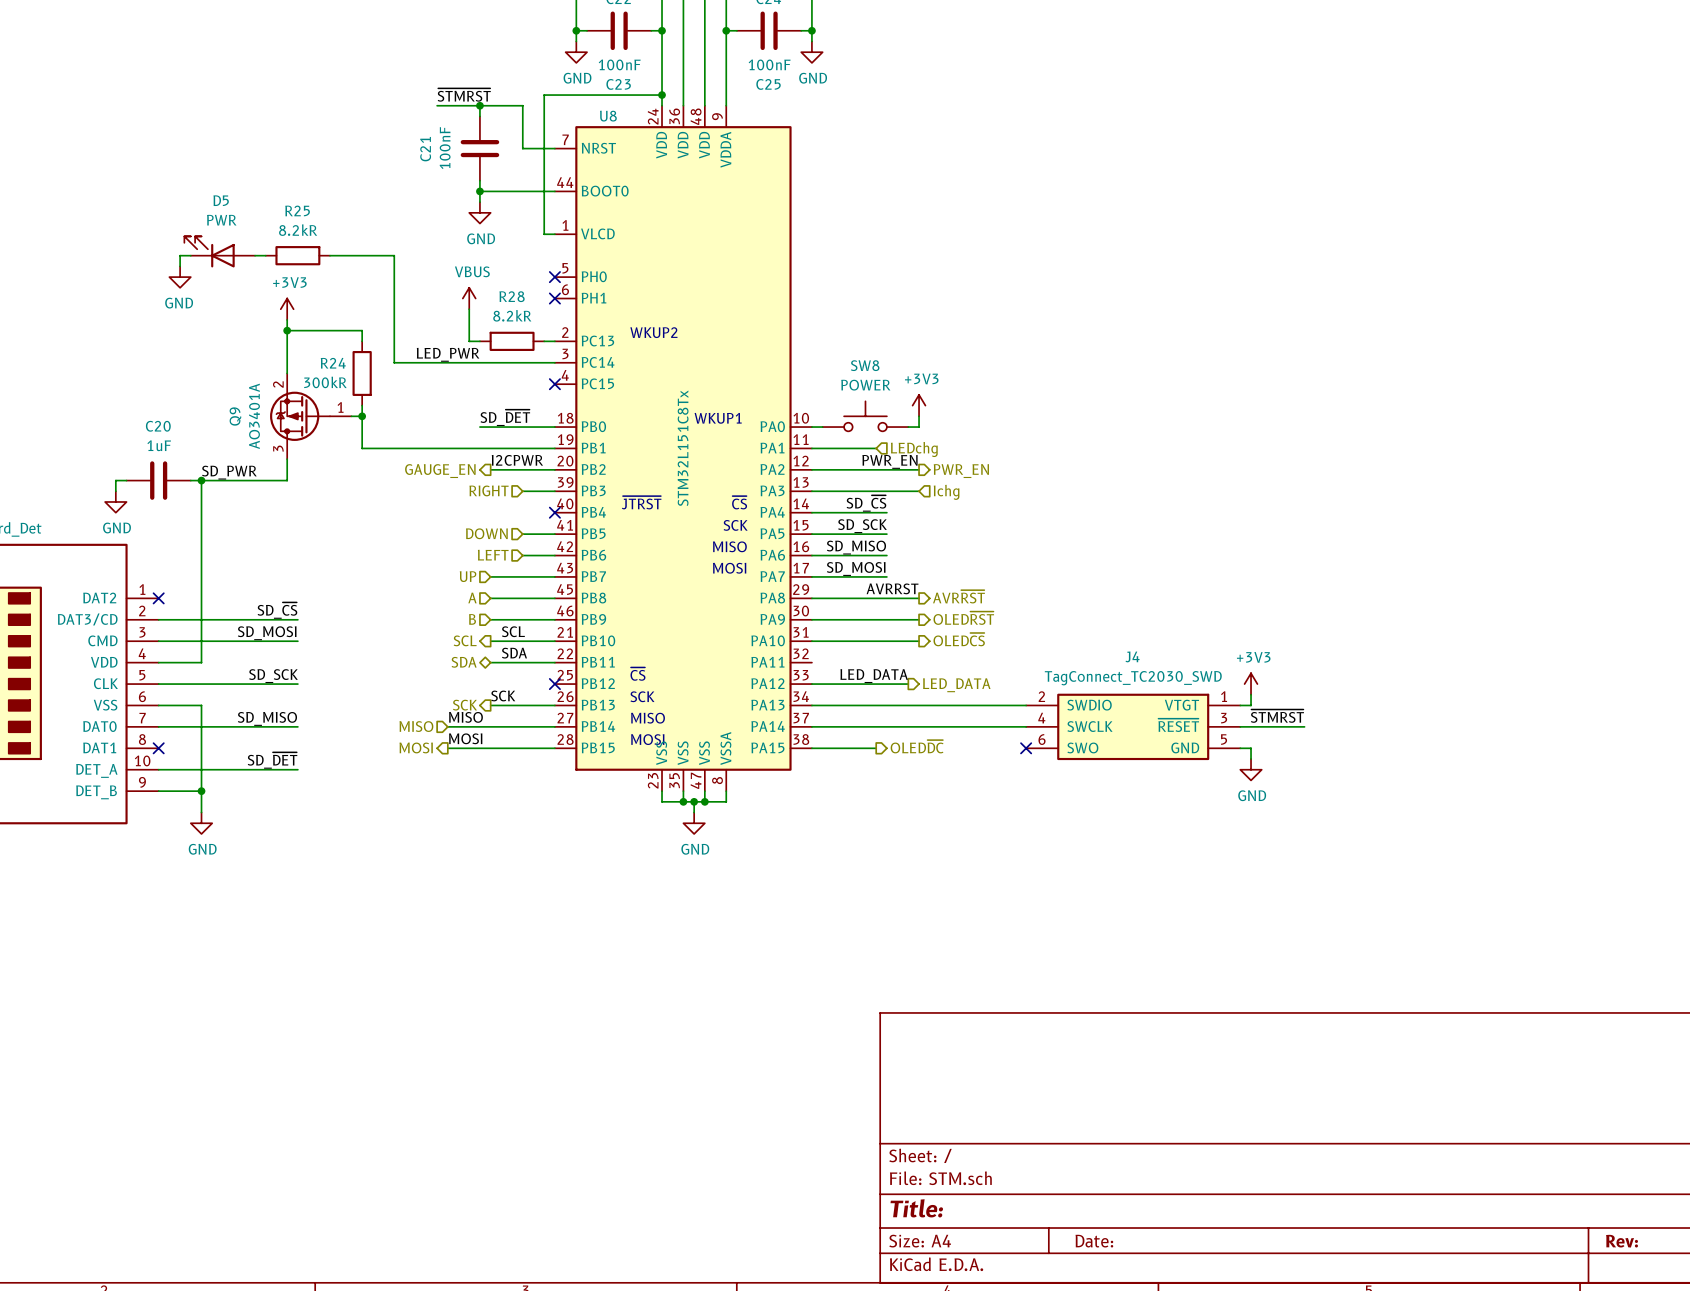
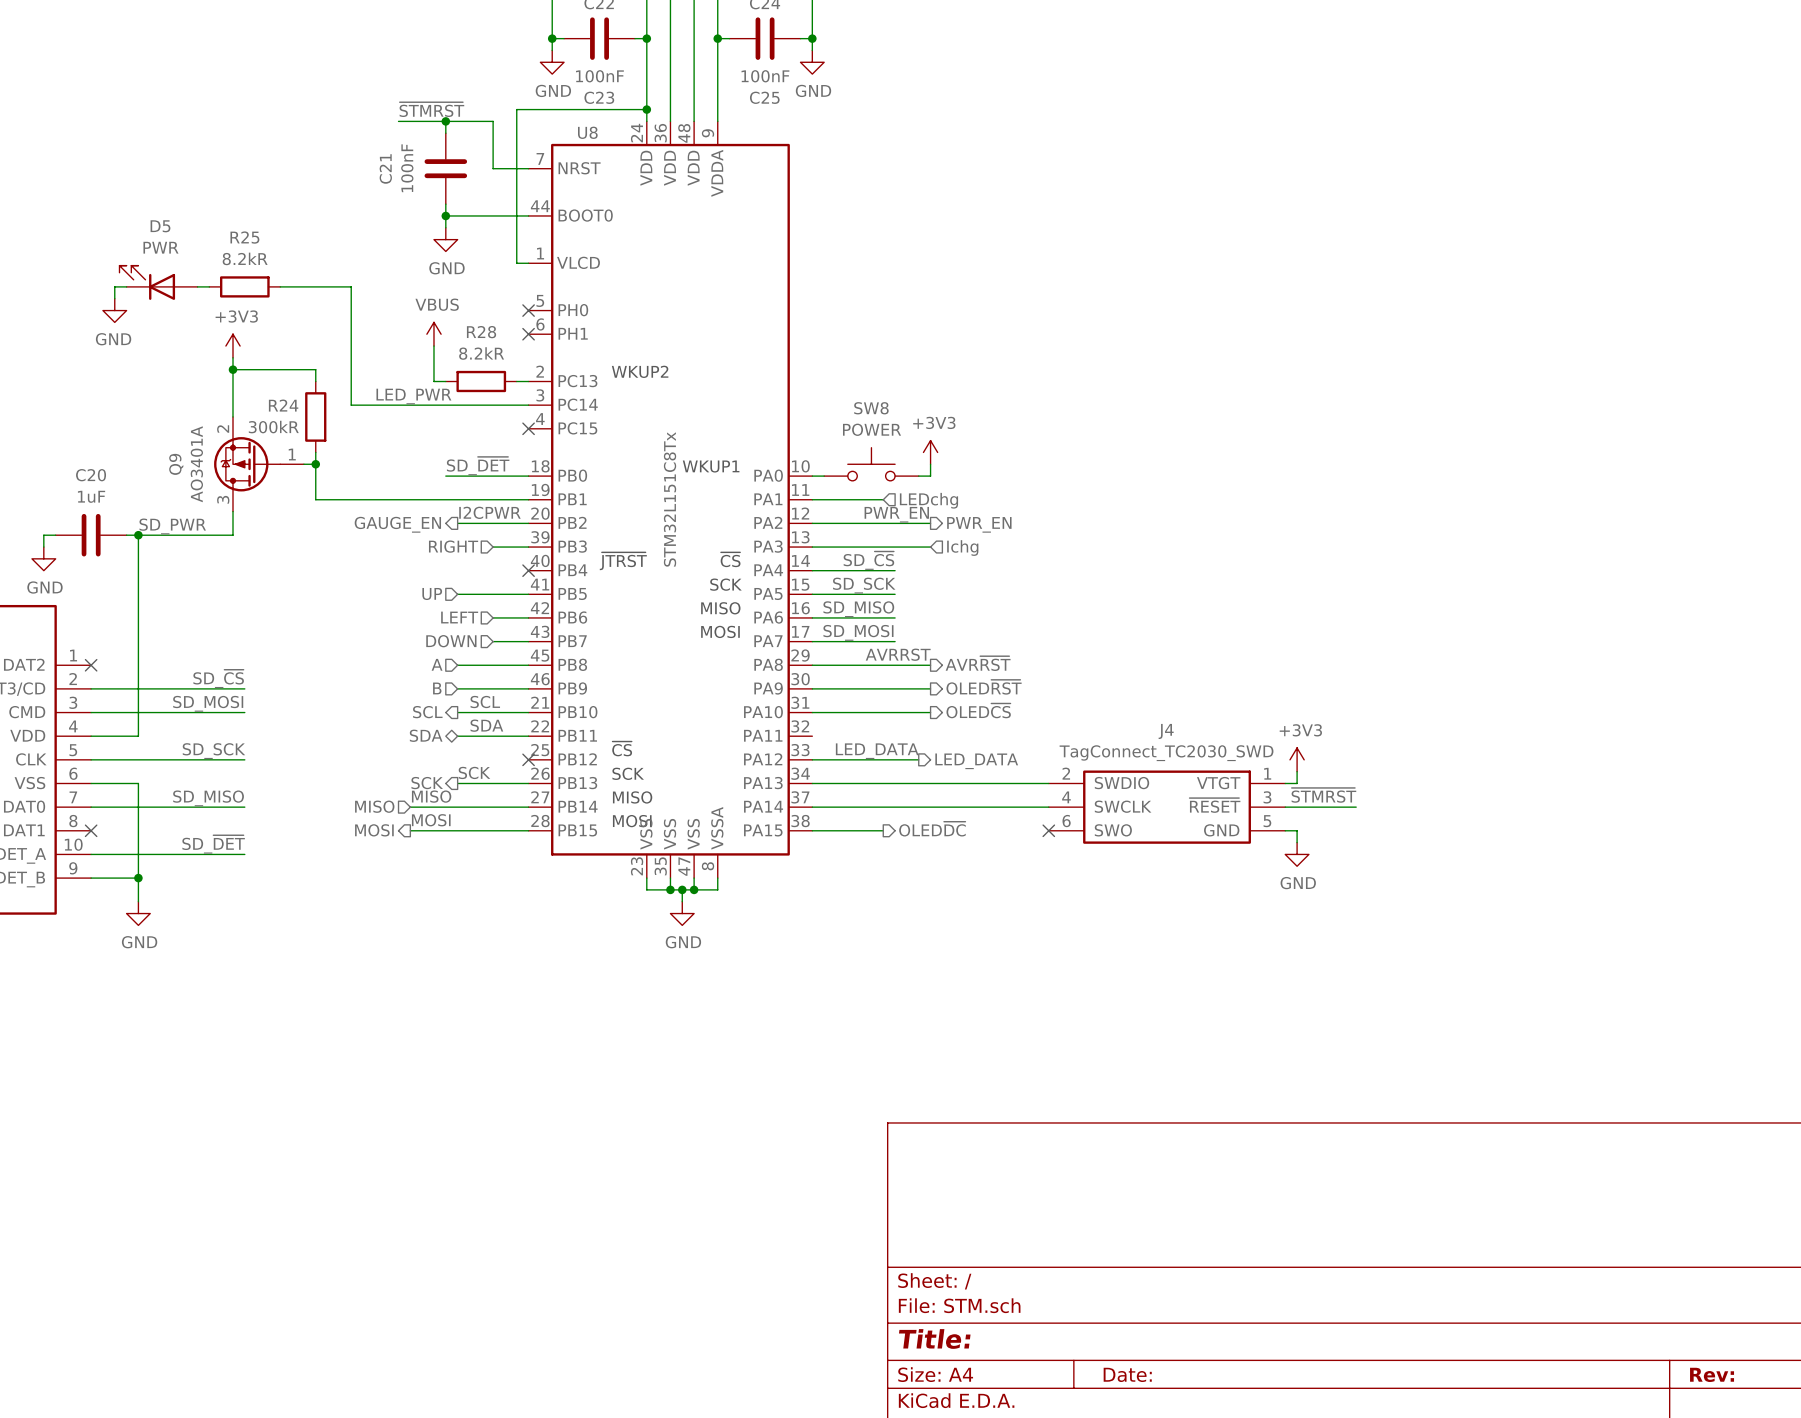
hierarchical label position: DOWN (486, 533) -> DOWN (451, 641)
hierarchical label position: UP (468, 576) -> UP (432, 594)
wire: (490, 576) (522, 576) -> (457, 594) (493, 594)

